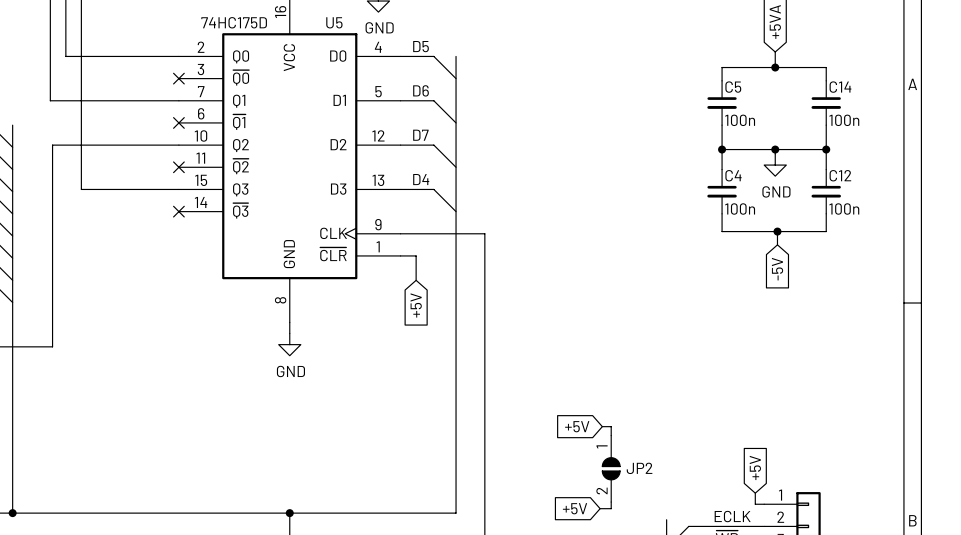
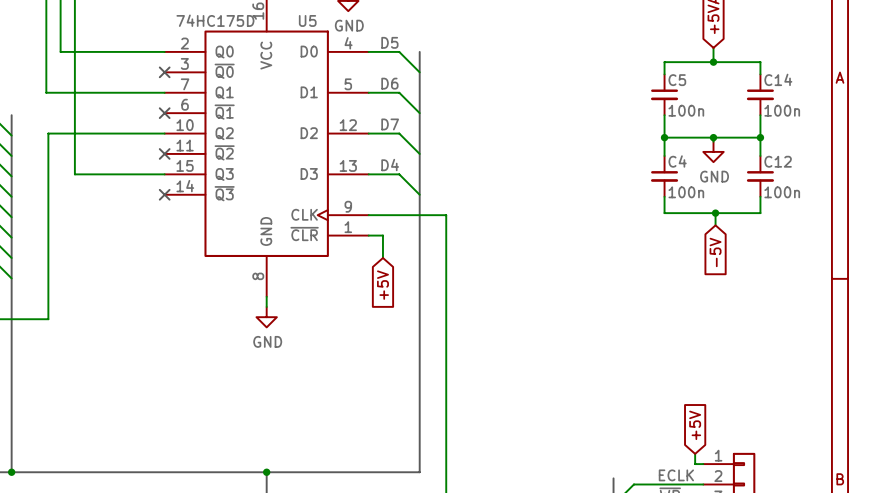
global label: +5V (577, 426) -> none
wire: (602, 426) (611, 426) (611, 435) -> none
JP2: (611, 468) -> none
wire: (611, 502) (611, 508) (600, 508) -> none
global label: +5V (575, 508) -> none

